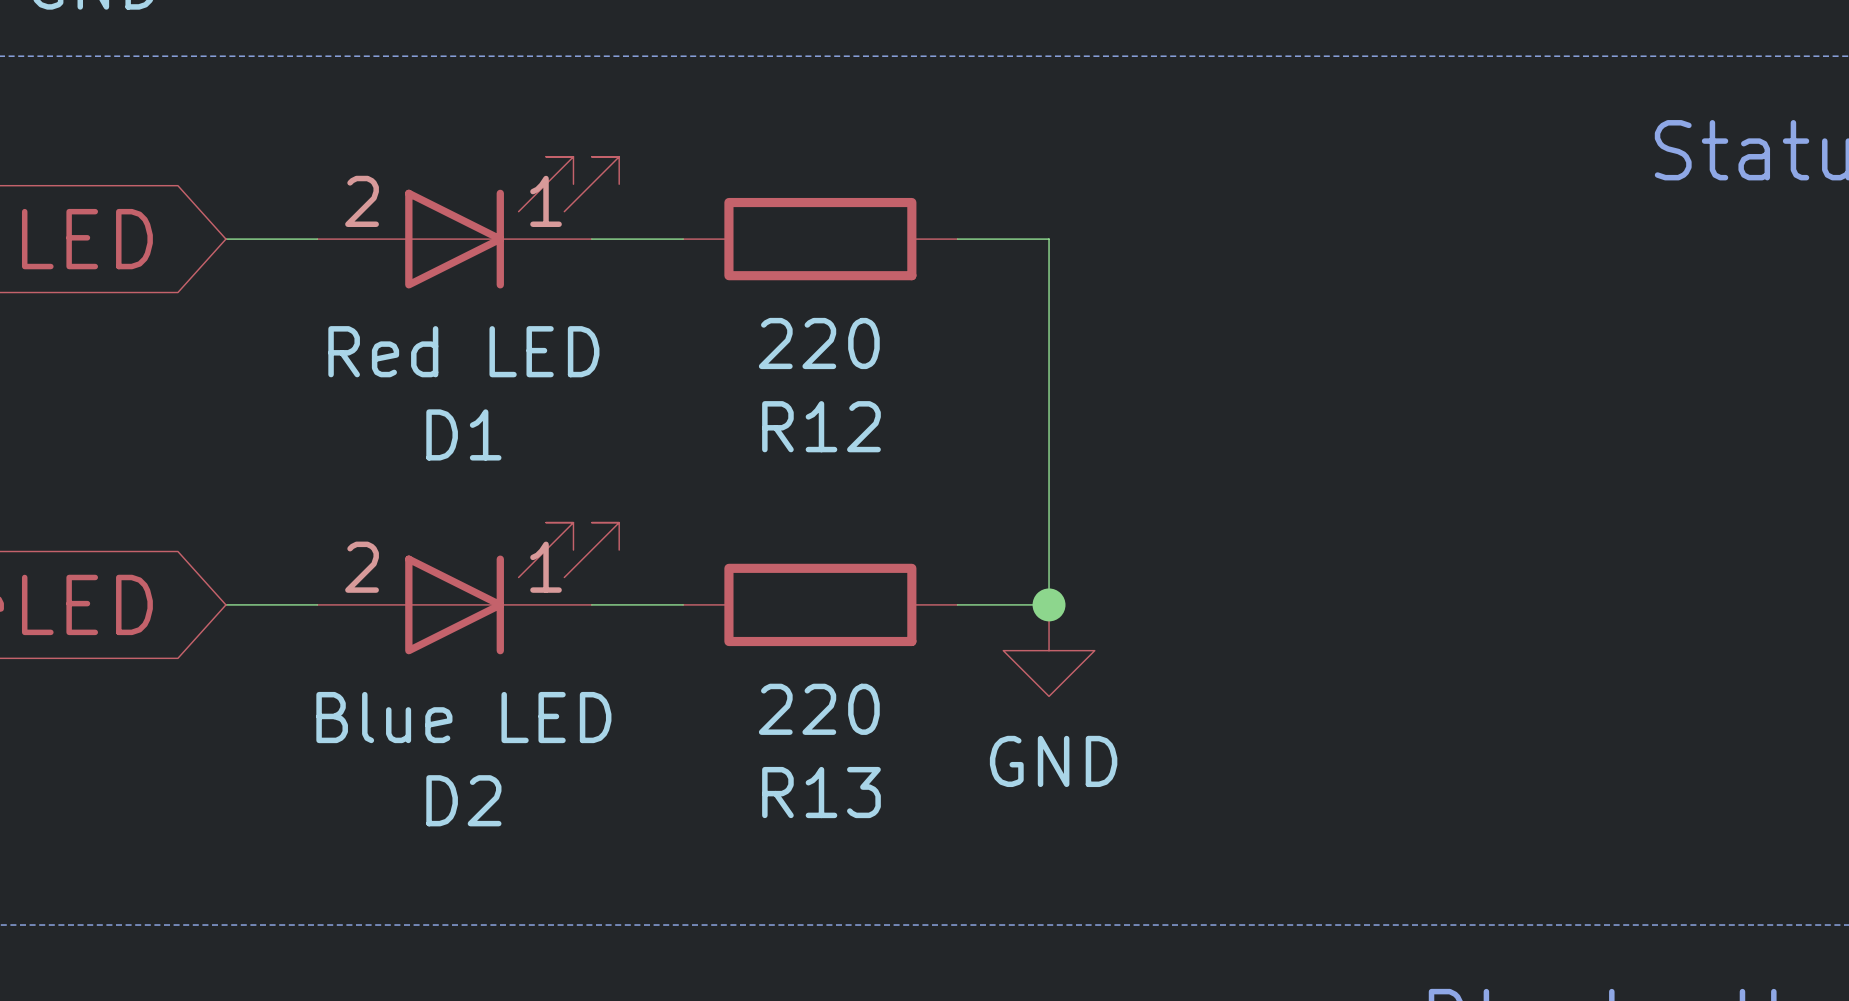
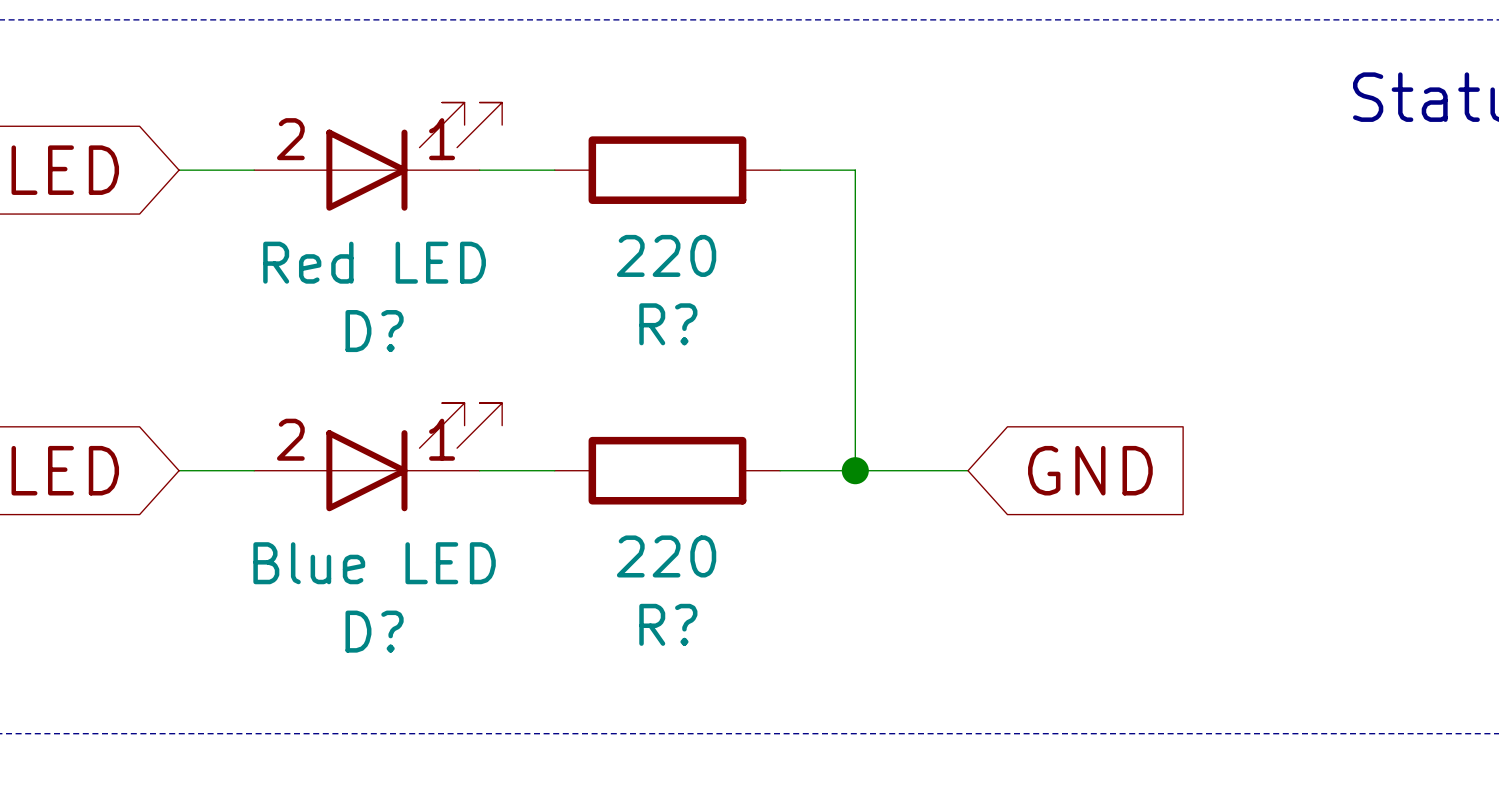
R12 name: R12 (821, 426) -> R? (668, 324)
D1 name: D1 (463, 434) -> D? (374, 331)
wire: none -> (855, 470) (968, 470)
global label: none -> GND (1090, 470)
power symbol: GND (1049, 650) -> none
R13 name: R13 (821, 792) -> R? (668, 624)
D2 name: D2 (463, 800) -> D? (374, 631)

